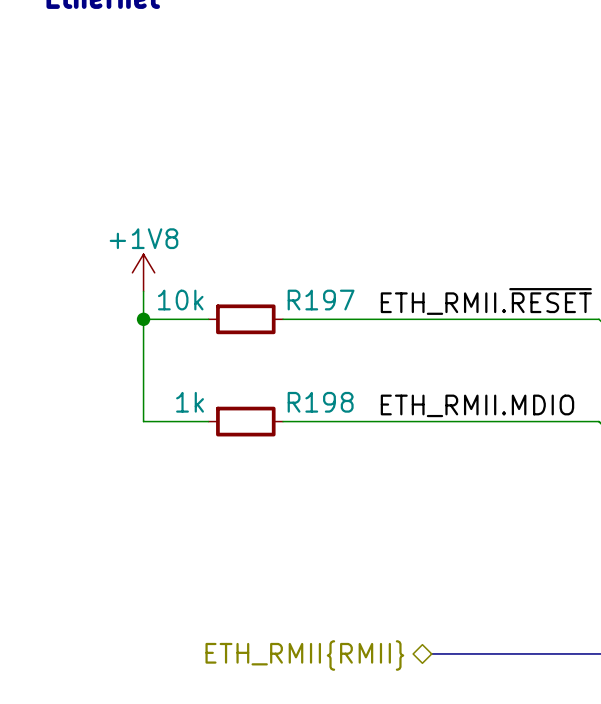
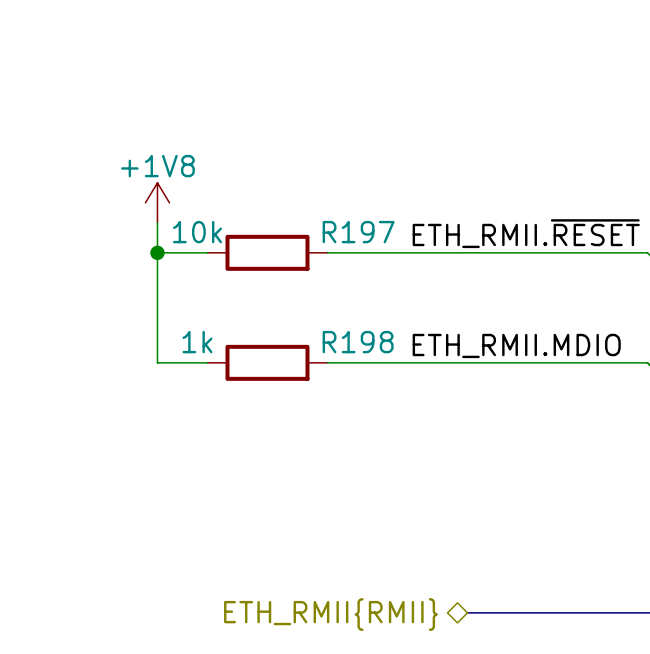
R197 symbol: [208, 304, 284, 335] -> [207, 234, 328, 271]
R198 symbol: [208, 406, 284, 437] -> [207, 344, 328, 381]

